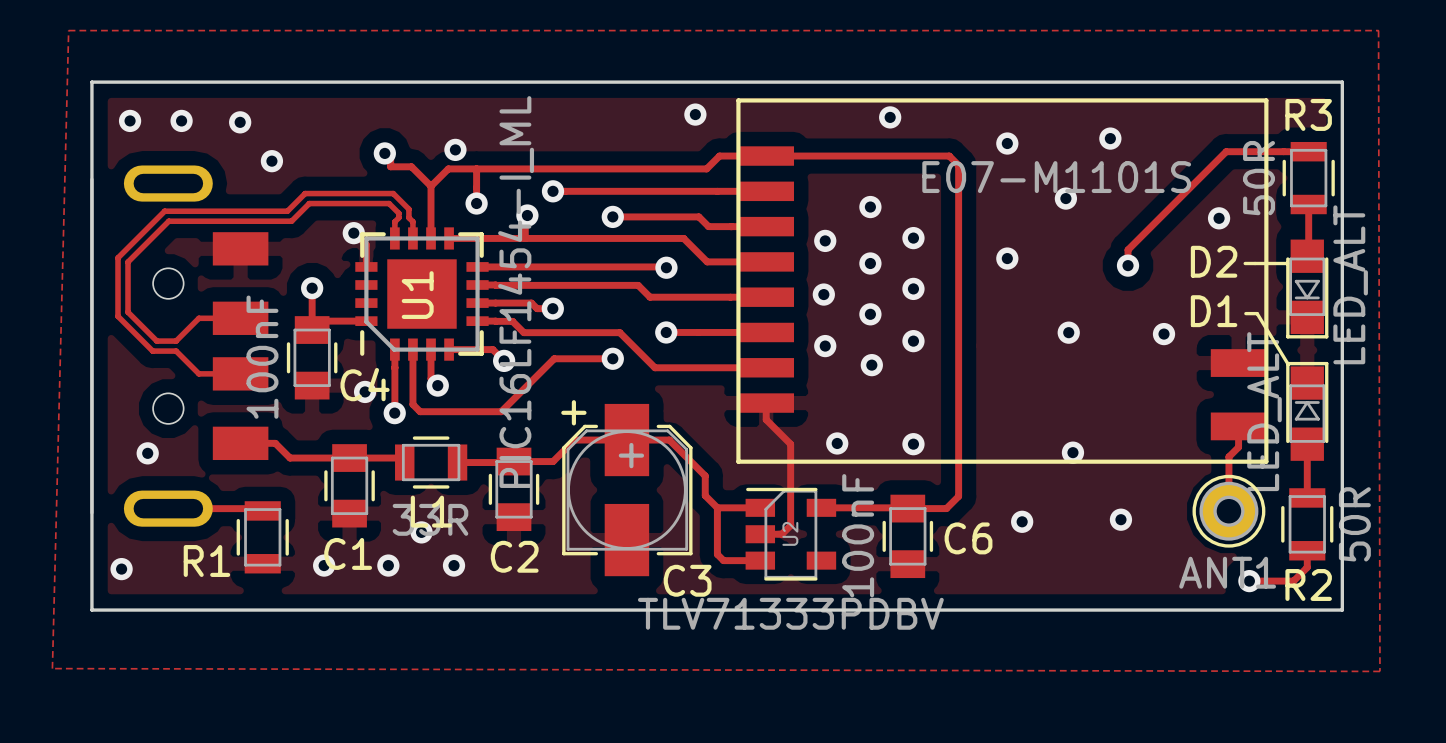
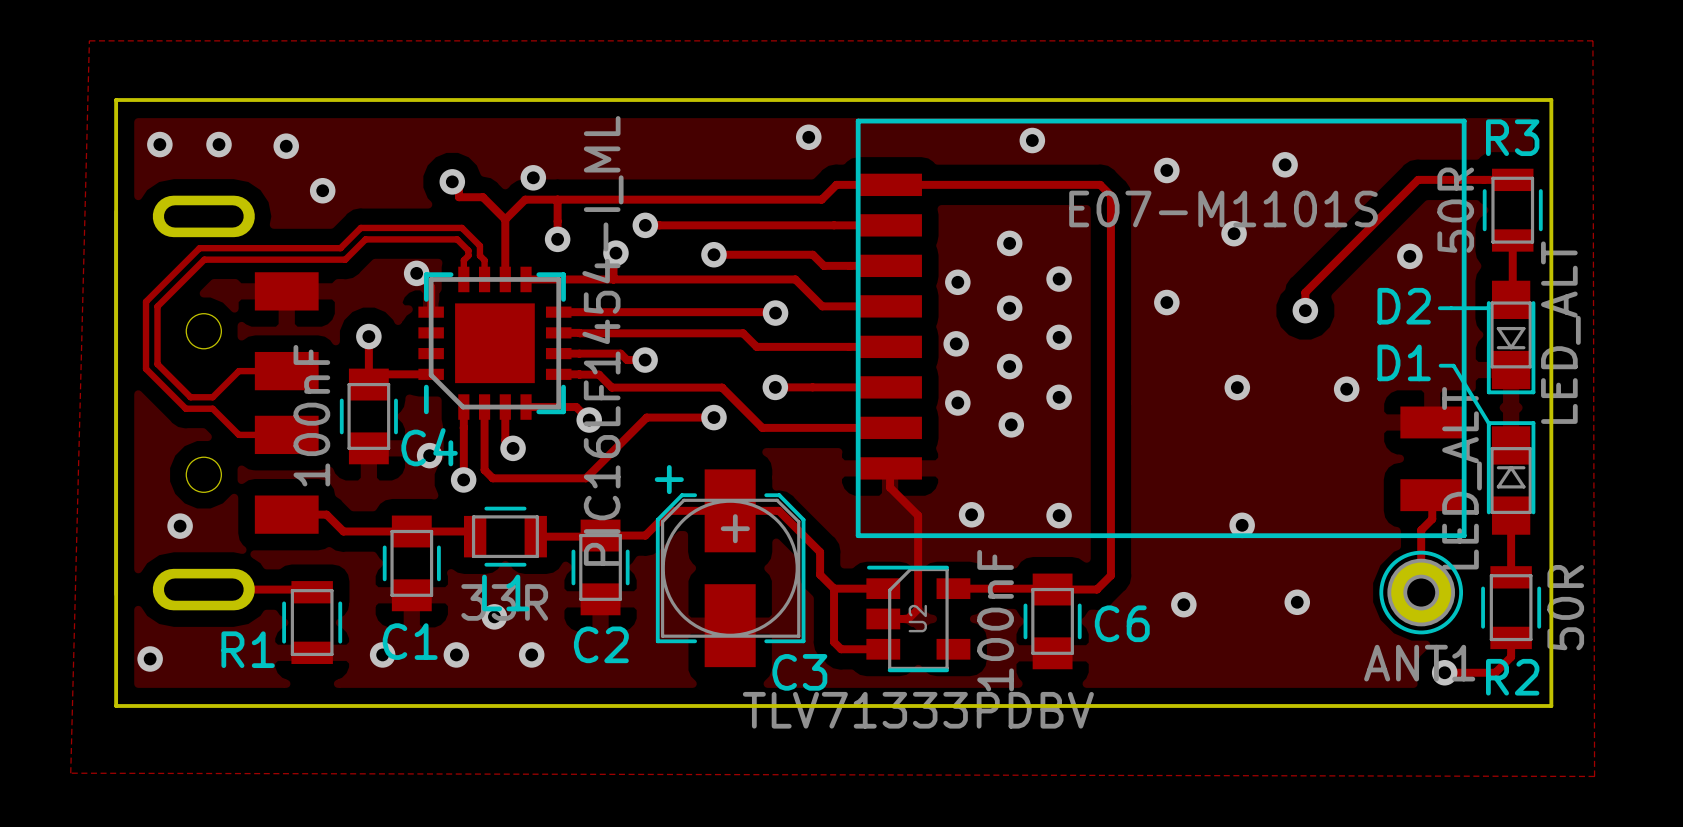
U1 name: U1 (417, 295) -> none

